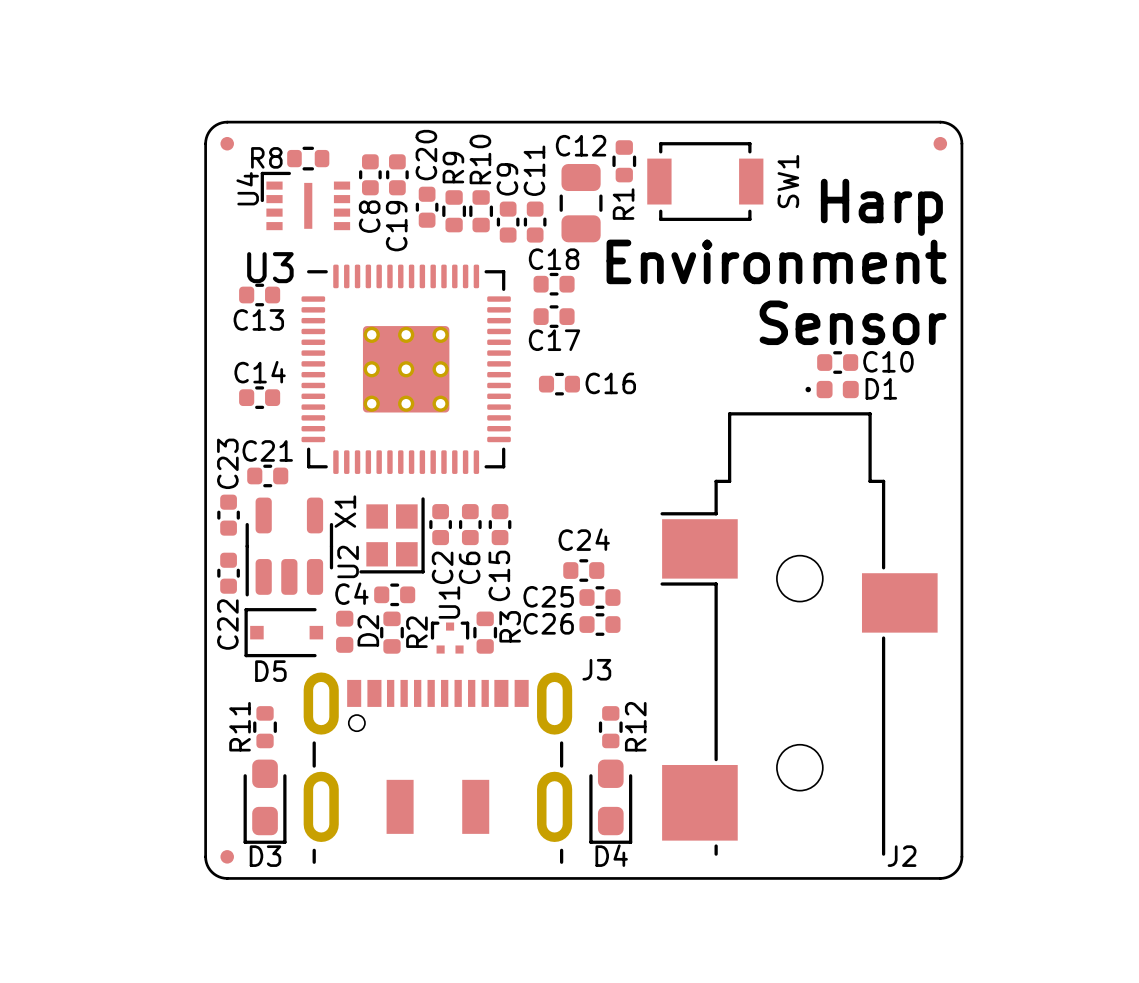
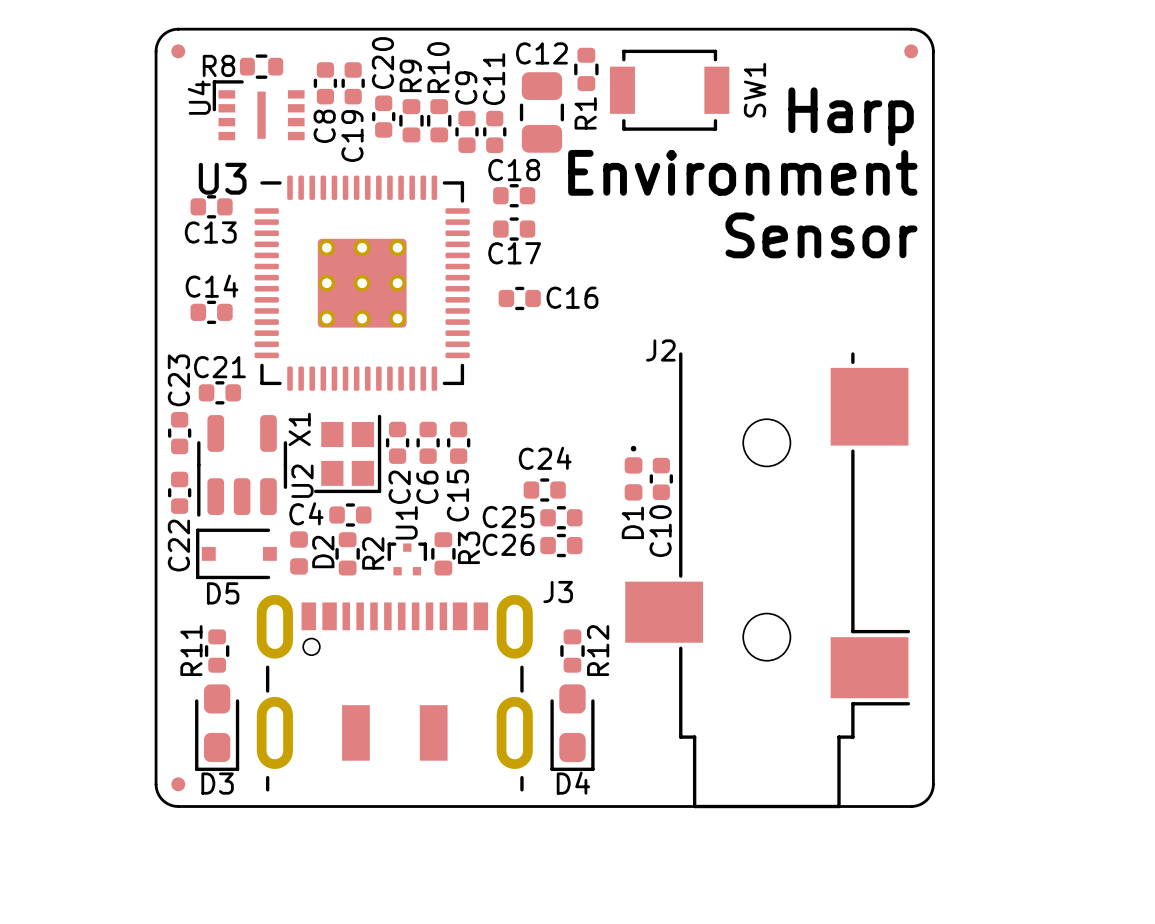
C10 rotation: 0° (837, 362) -> 90° clockwise (661, 478)
C10 position: (837, 362) -> (661, 478)
D1 rotation: 0° (832, 389) -> 90° clockwise (633, 473)
D1 position: (832, 389) -> (633, 473)
J2 rotation: 0° (799, 633) -> 180° (767, 580)

